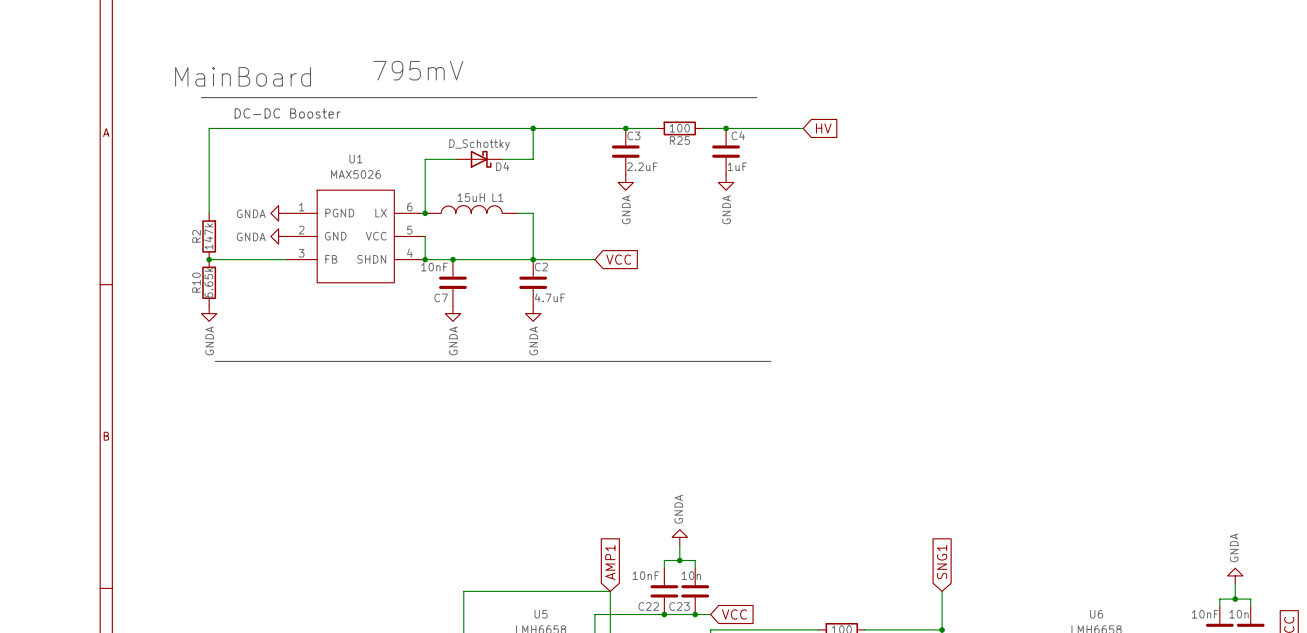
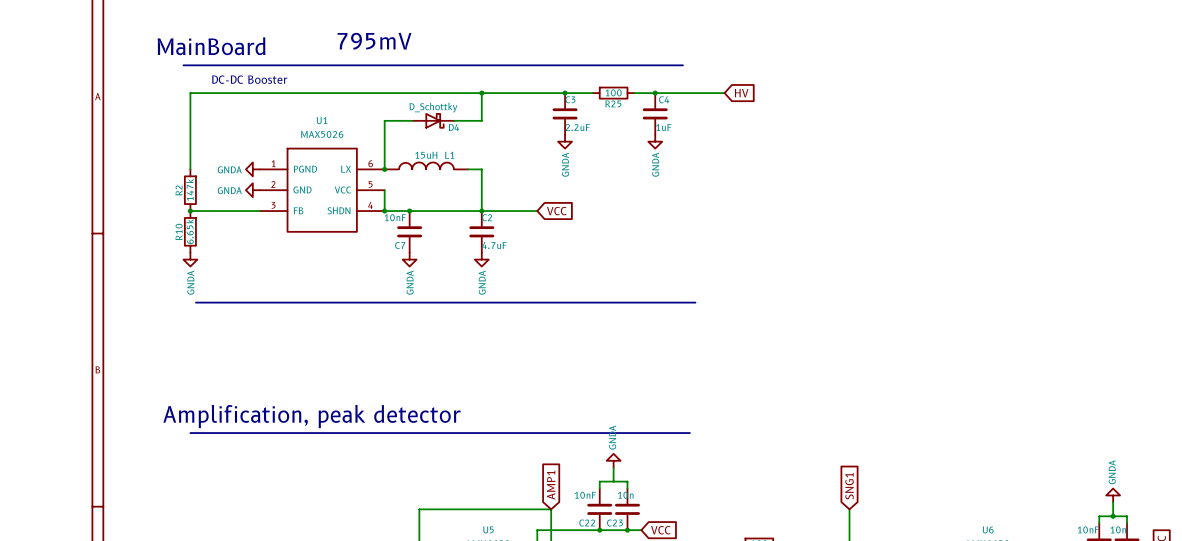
text: none -> Amplification, peak detector (311, 416)
bus: none -> (190, 433) (689, 433)
junction: (679, 560) -> none

